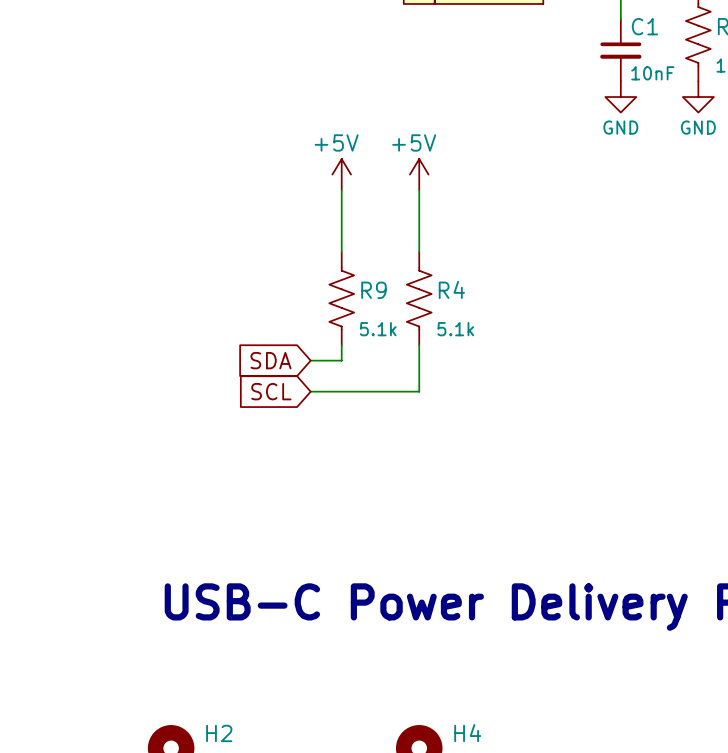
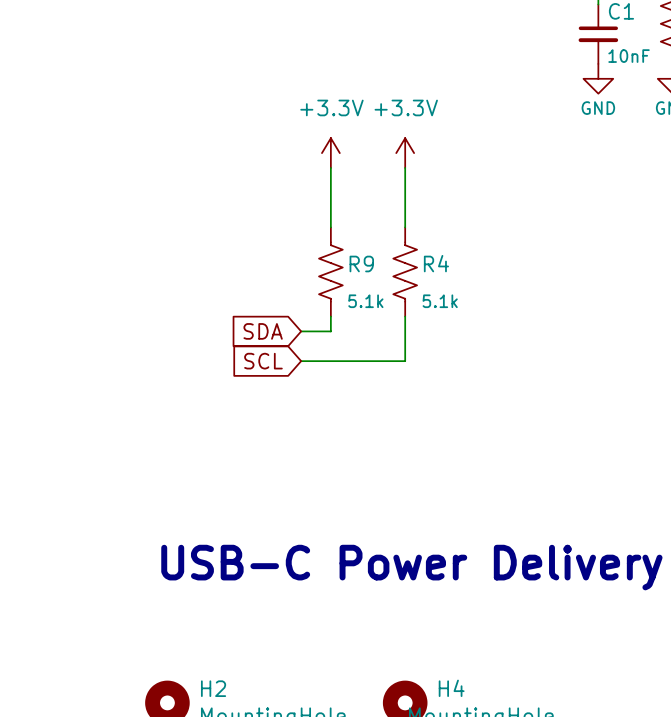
power symbol: +5V (341, 174) -> +3.3V (330, 153)
power symbol: +5V (419, 174) -> +3.3V (405, 153)

